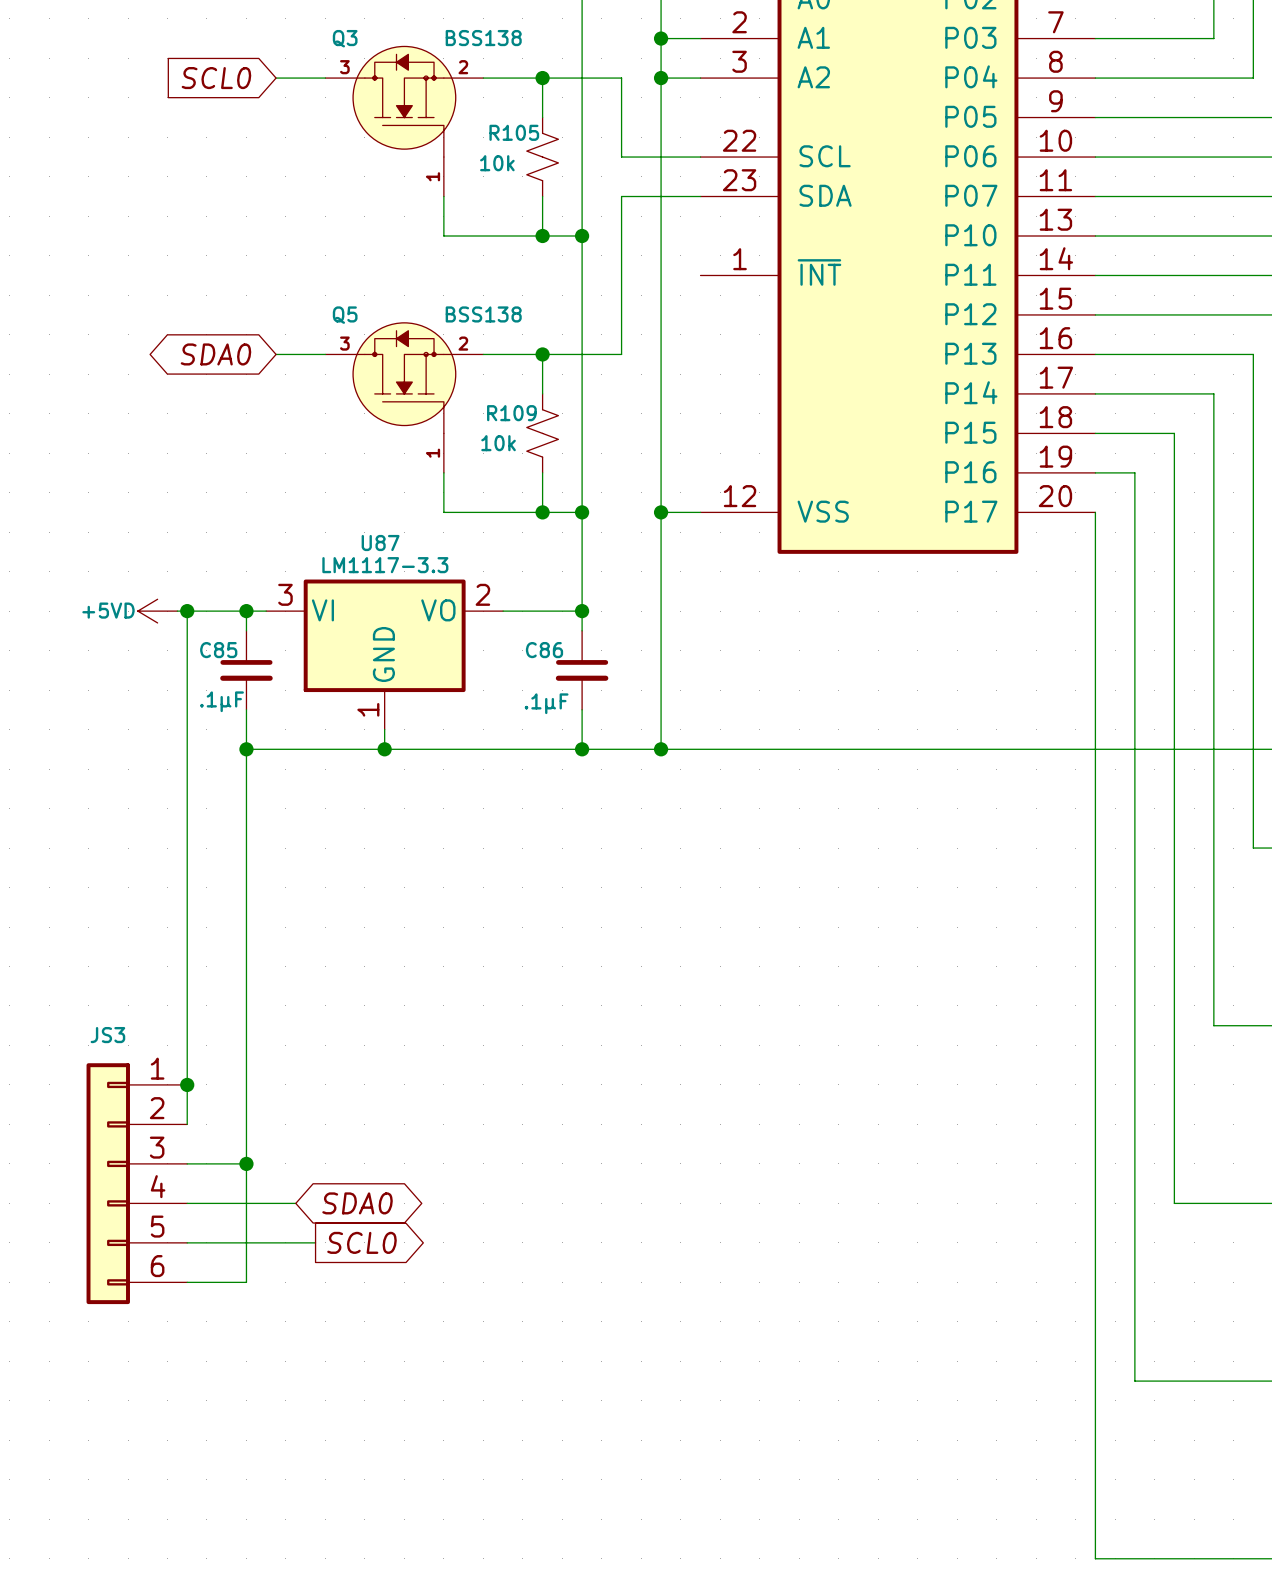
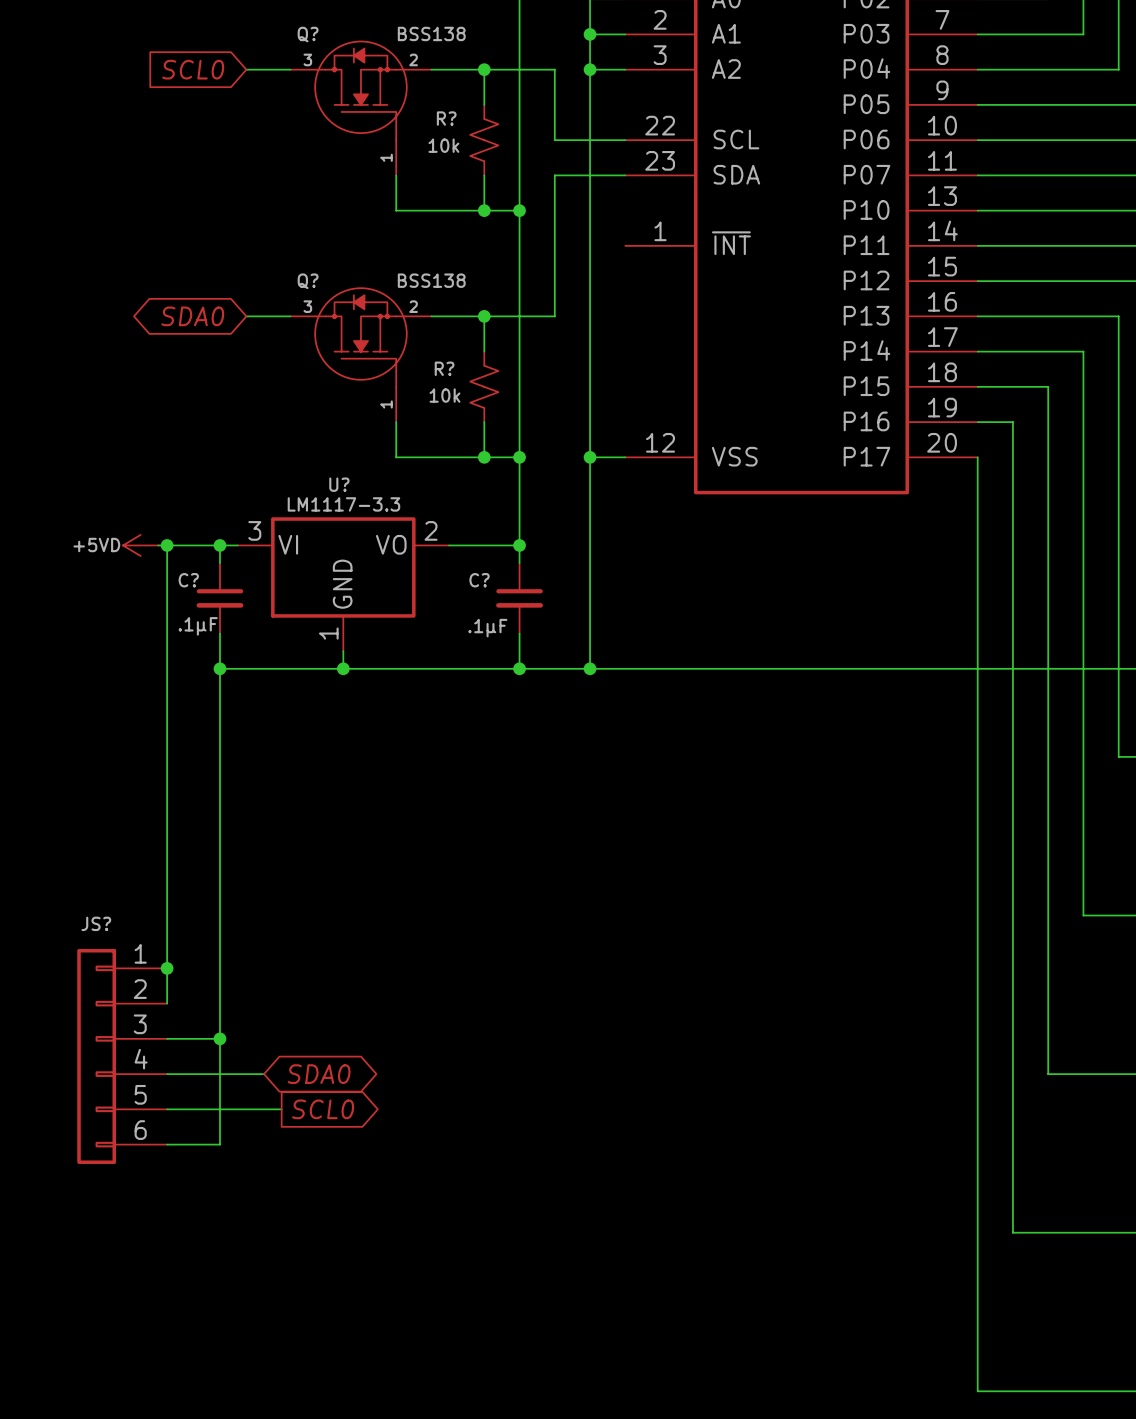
Q3 name: Q3 (345, 38) -> Q? (308, 34)
R105 name: R105 (514, 132) -> R? (446, 118)
Q5 name: Q5 (345, 315) -> Q? (308, 281)
R109 name: R109 (511, 413) -> R? (444, 368)
U87 name: U87 (380, 543) -> U? (339, 484)
C85 name: C85 (218, 650) -> C? (188, 580)
C86 name: C86 (544, 650) -> C? (479, 580)
JS3 name: JS3 (107, 1035) -> JS? (96, 923)

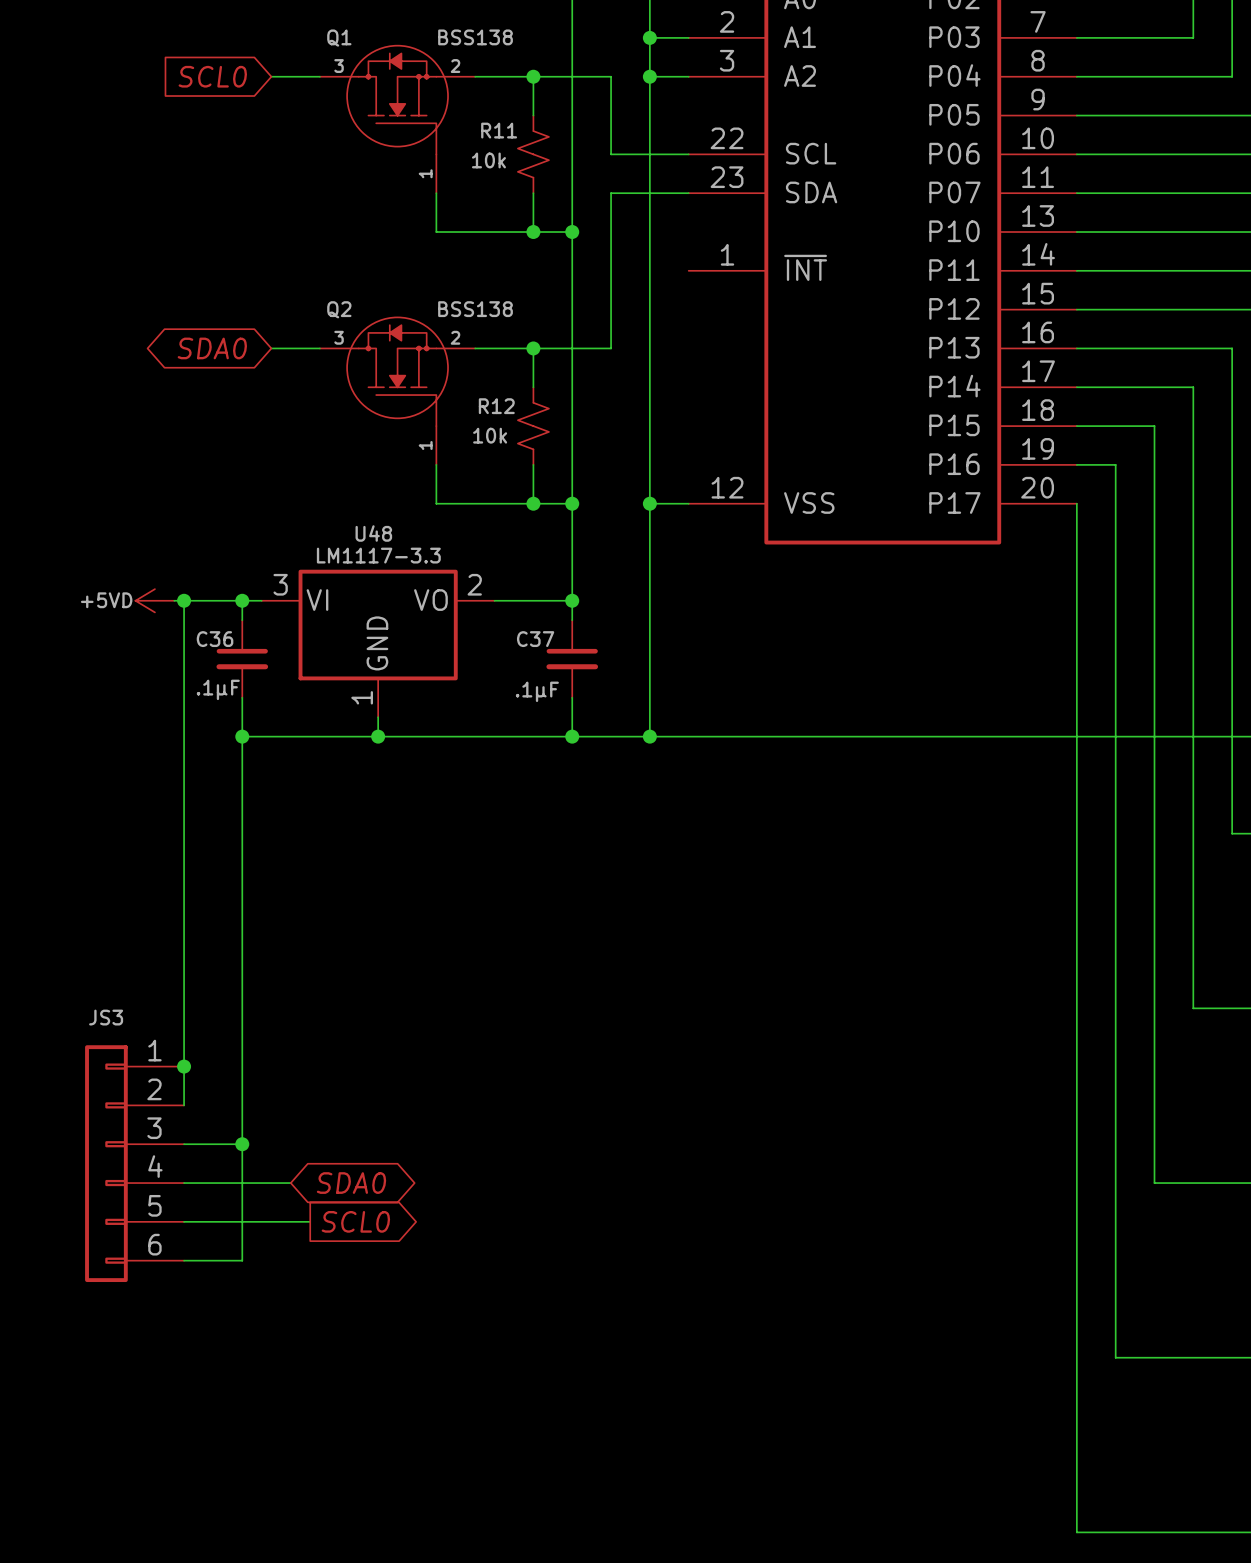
Q? name: Q? (308, 34) -> Q1 (339, 38)
R? name: R? (446, 118) -> R11 (499, 130)
Q? name: Q? (308, 281) -> Q2 (339, 309)
R? name: R? (444, 368) -> R12 (496, 406)
U? name: U? (339, 484) -> U48 (373, 533)
C? name: C? (188, 580) -> C36 (215, 639)
C? name: C? (479, 580) -> C37 (535, 639)
JS? name: JS? (96, 923) -> JS3 (106, 1017)

